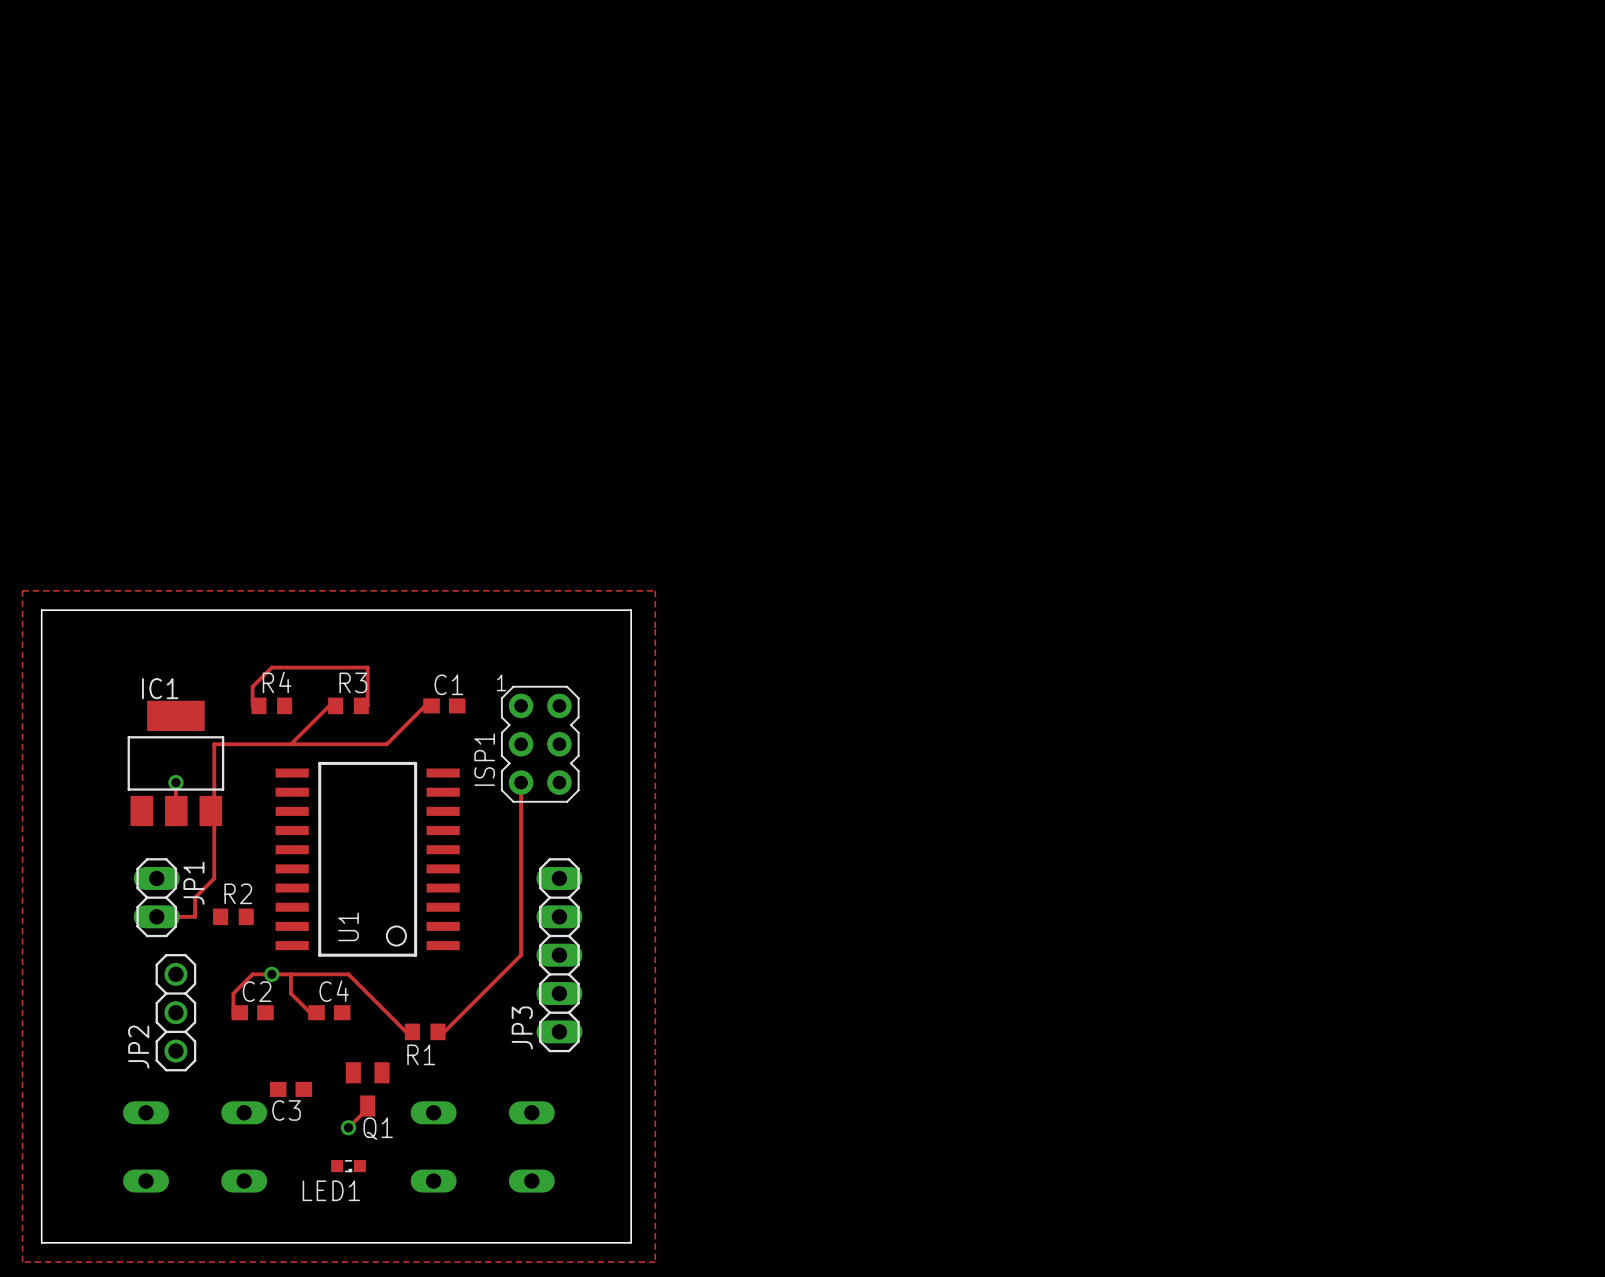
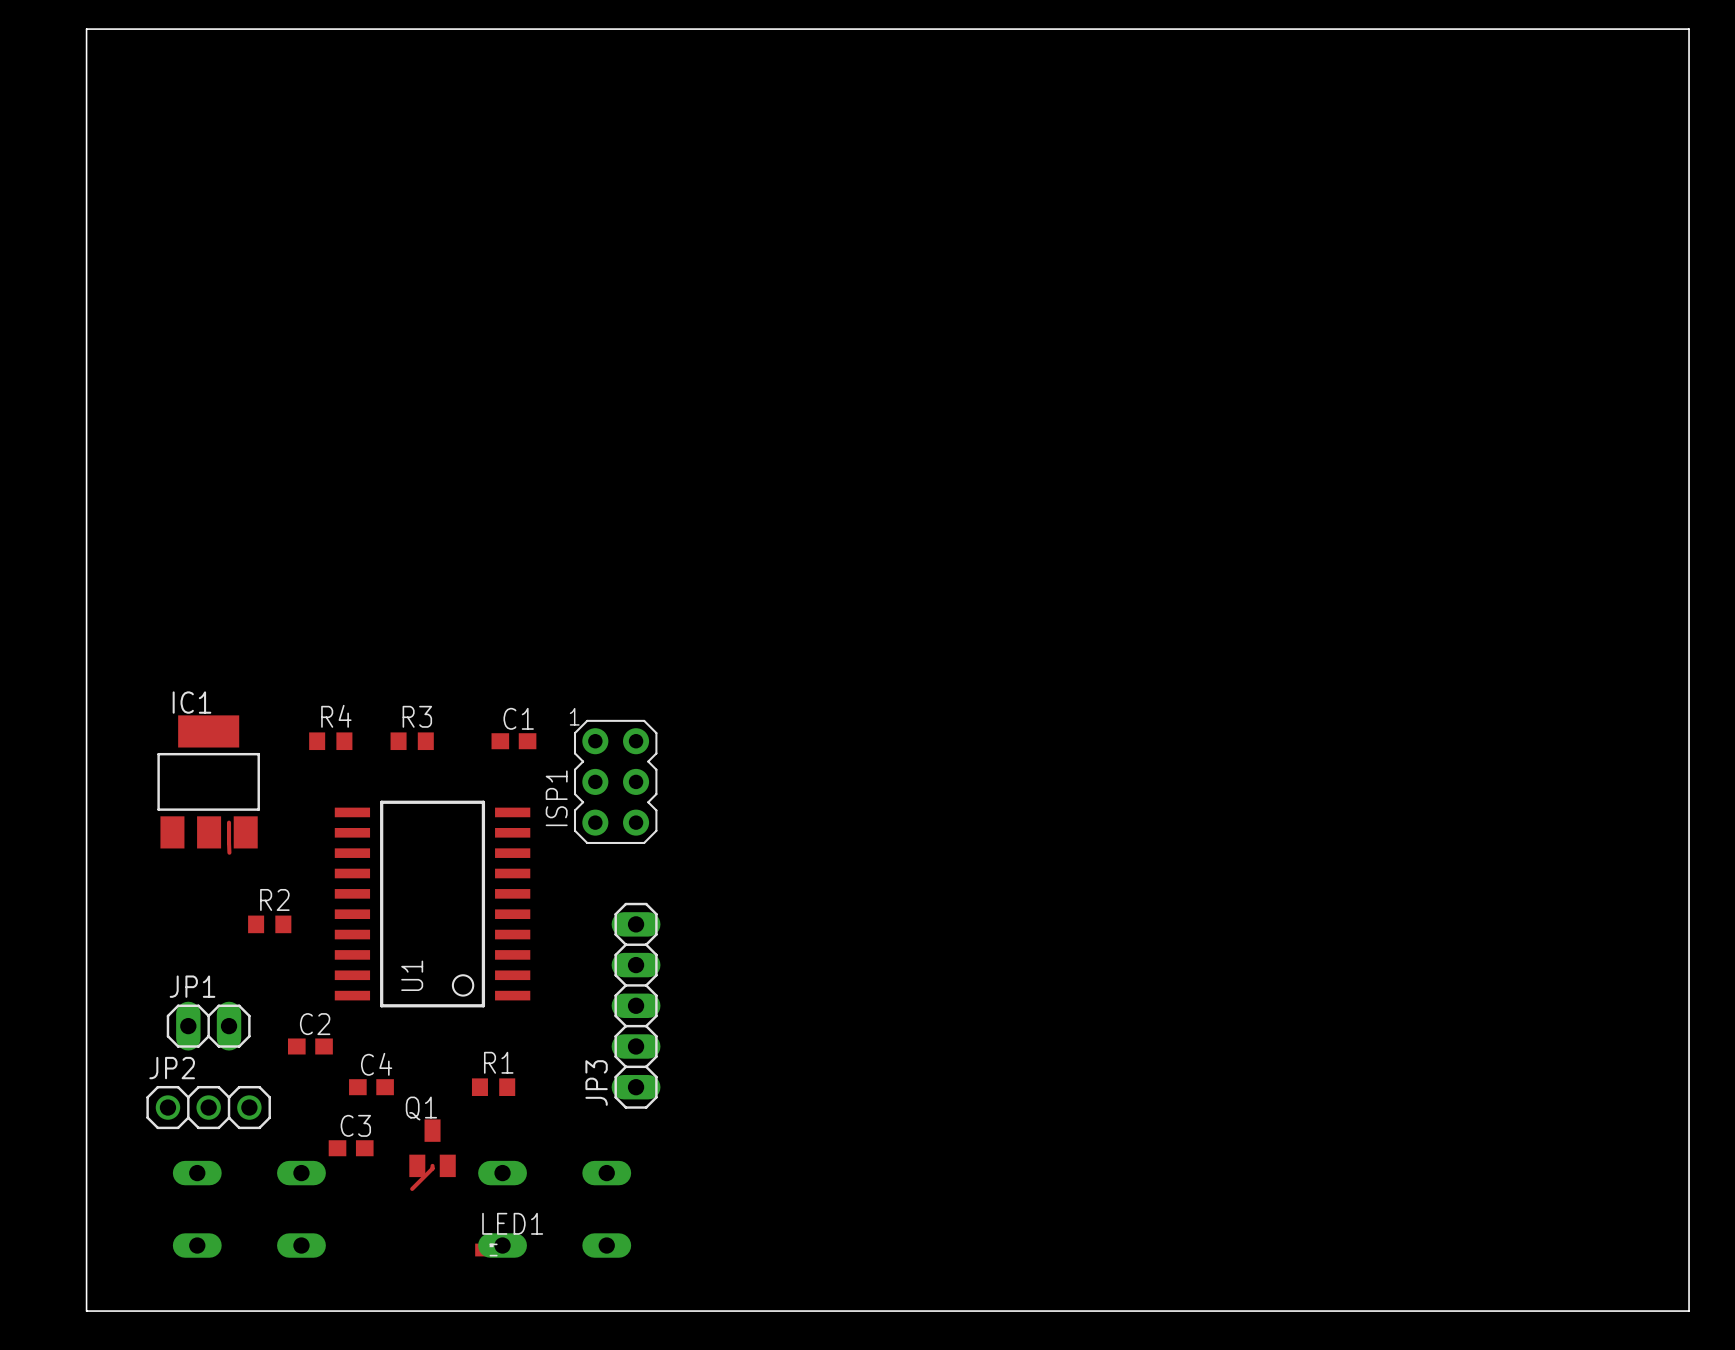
zone outline: (22, 590) (655, 590) (655, 1261) (22, 1261) (22, 590) -> none
board edge: (41, 610) (631, 610) (631, 1242) -> (86, 639) (86, 29) (1689, 29) (1689, 1311) (712, 1311)
track: (258, 705) (252, 705) (252, 686) (271, 667) (367, 667) (367, 705) (361, 705) -> none
track: (335, 705) (329, 705) (290, 744) -> none
track: (431, 705) (425, 705) (386, 744) (214, 744) (214, 801) (210, 810) (214, 820) (214, 878) (195, 897) (195, 916) (156, 916) -> none
IC1 position: (175, 763) -> (208, 781)
via: (175, 782) -> none
track: (521, 782) (521, 955) (444, 1031) (438, 1031) -> none
JP1 name position: JP1 (193, 883) -> JP1 (192, 986)
JP1 rotation: 0° (156, 897) -> 90° clockwise (208, 1026)
JP1 position: (156, 897) -> (208, 1026)
R2 position: (233, 916) -> (269, 924)
via: (271, 974) -> none
track: (290, 974) (290, 993) (310, 1012) (316, 1012) -> none
JP2 rotation: 0° (175, 1012) -> 90° clockwise (208, 1107)
track: (239, 1012) (233, 1012) (233, 993) (252, 974) (348, 974) (406, 1031) (412, 1031) -> none
C2 position: (252, 1012) -> (310, 1046)
C4 position: (329, 1012) -> (371, 1087)
R1 name position: R1 (421, 1054) -> R1 (498, 1062)
Q1 rotation: 0° (367, 1089) -> 180° (432, 1148)
C3 name position: C3 (286, 1110) -> C3 (355, 1125)
via: (348, 1127) -> none
LED1 rotation: 0° (348, 1166) -> 180° (493, 1250)
LED1 position: (348, 1166) -> (493, 1250)

